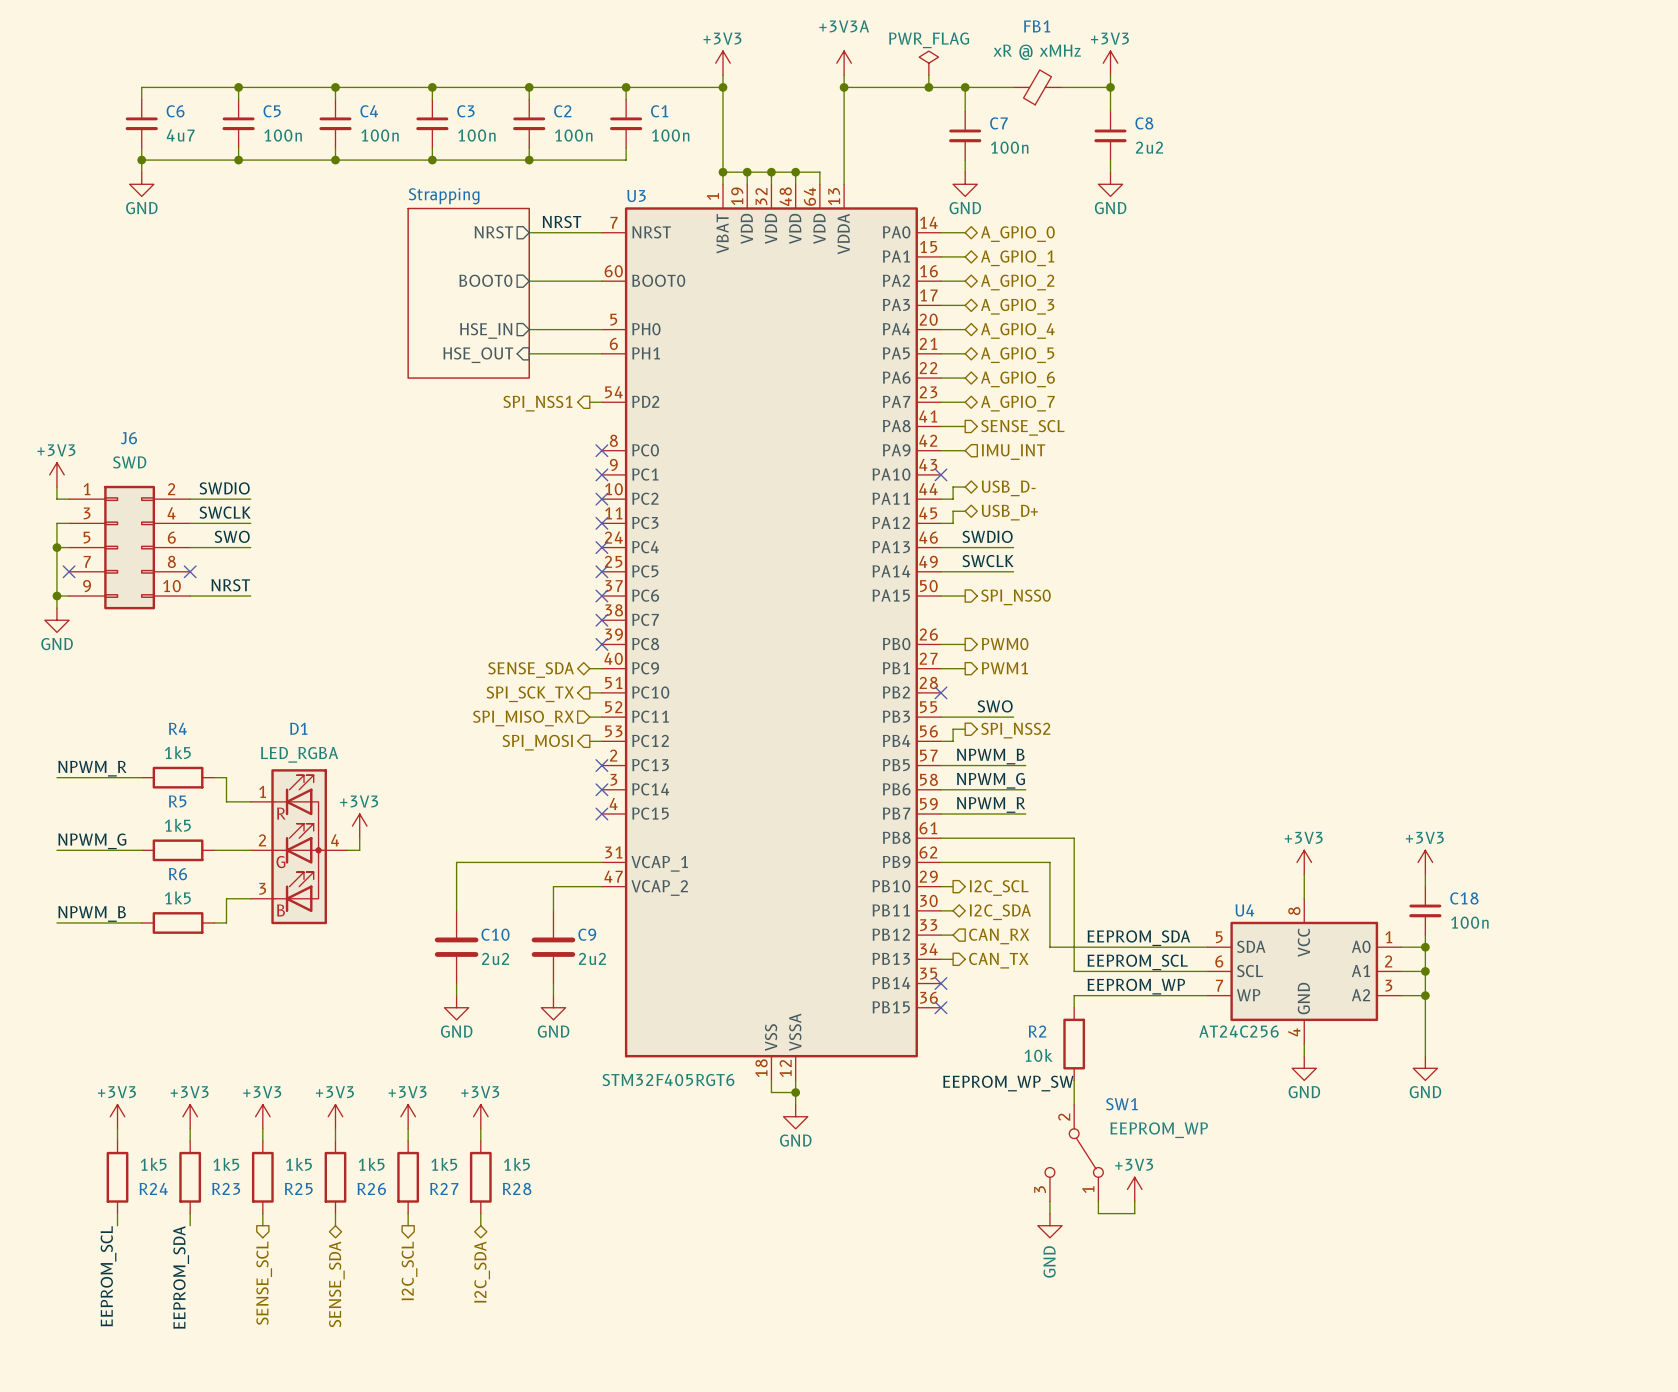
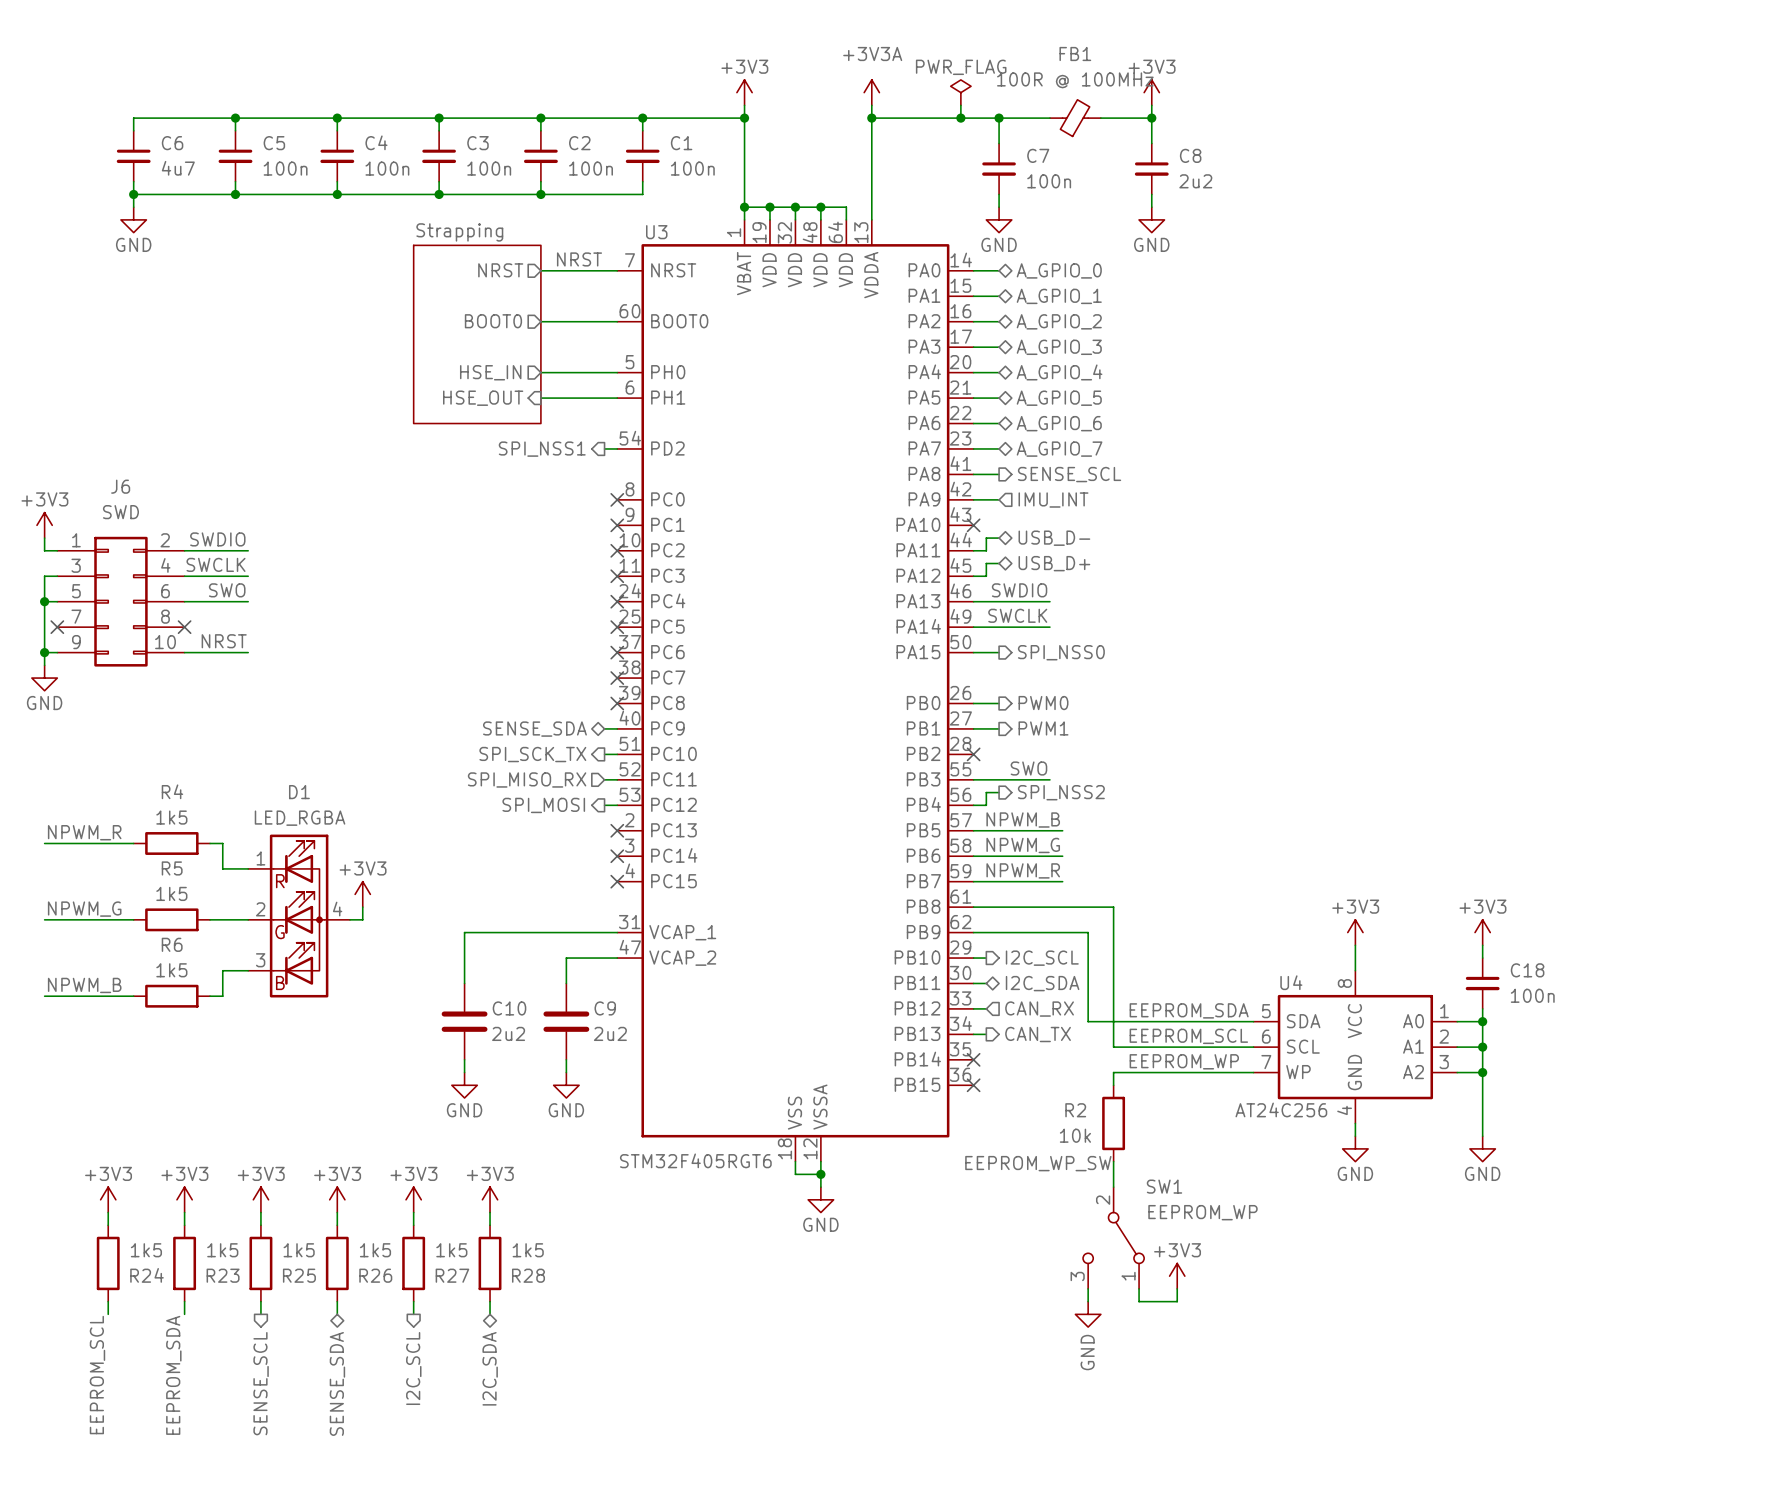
FB1 value: xR @ xMHz (1037, 52) -> 100R @ 100MHz (1075, 80)

